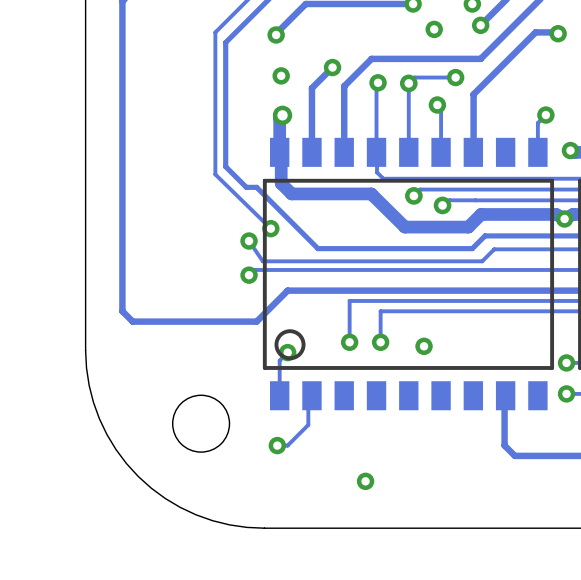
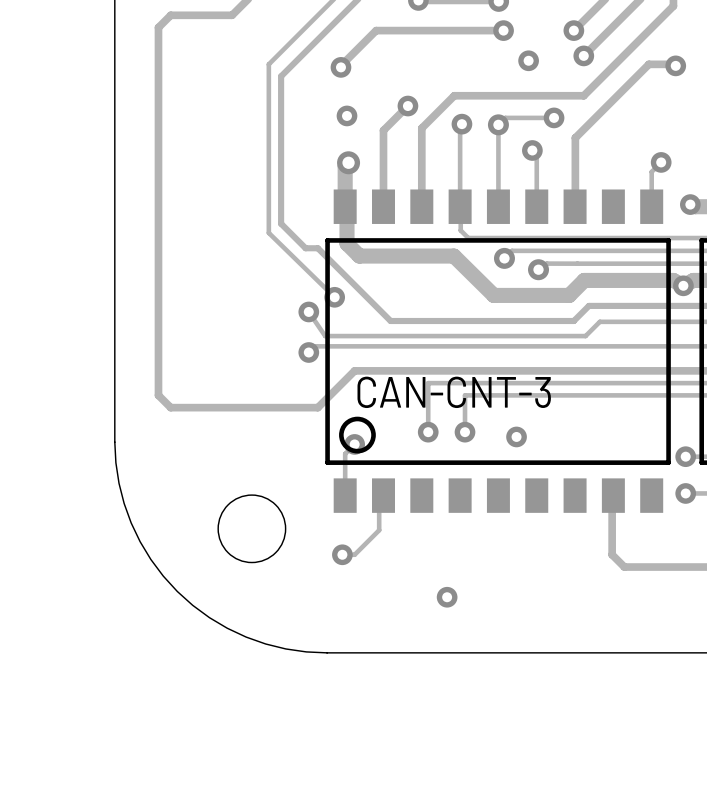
CAN-CNT-3 name: none -> CAN-CNT-3 (454, 392)

